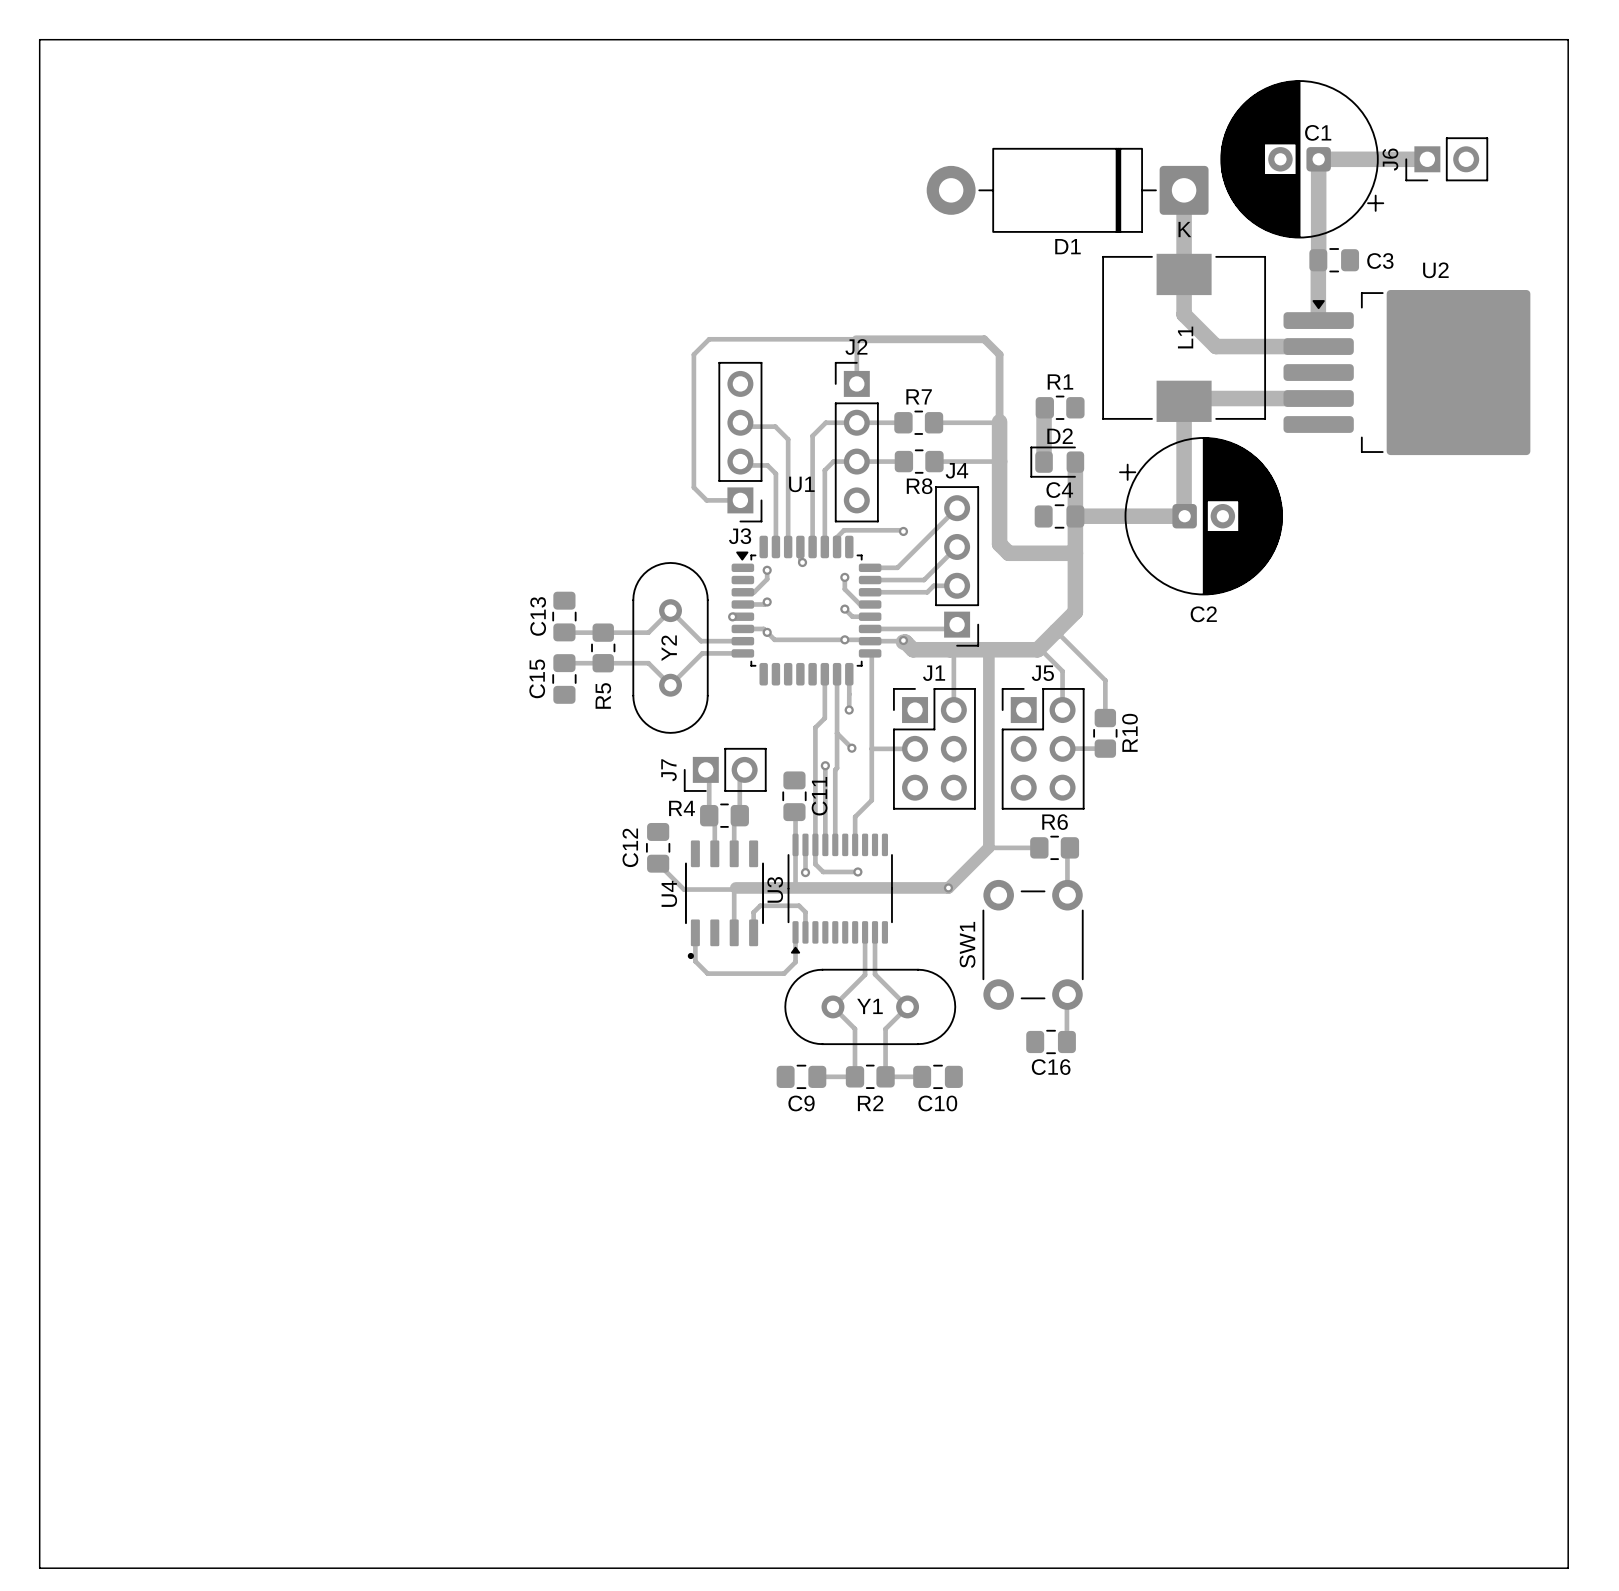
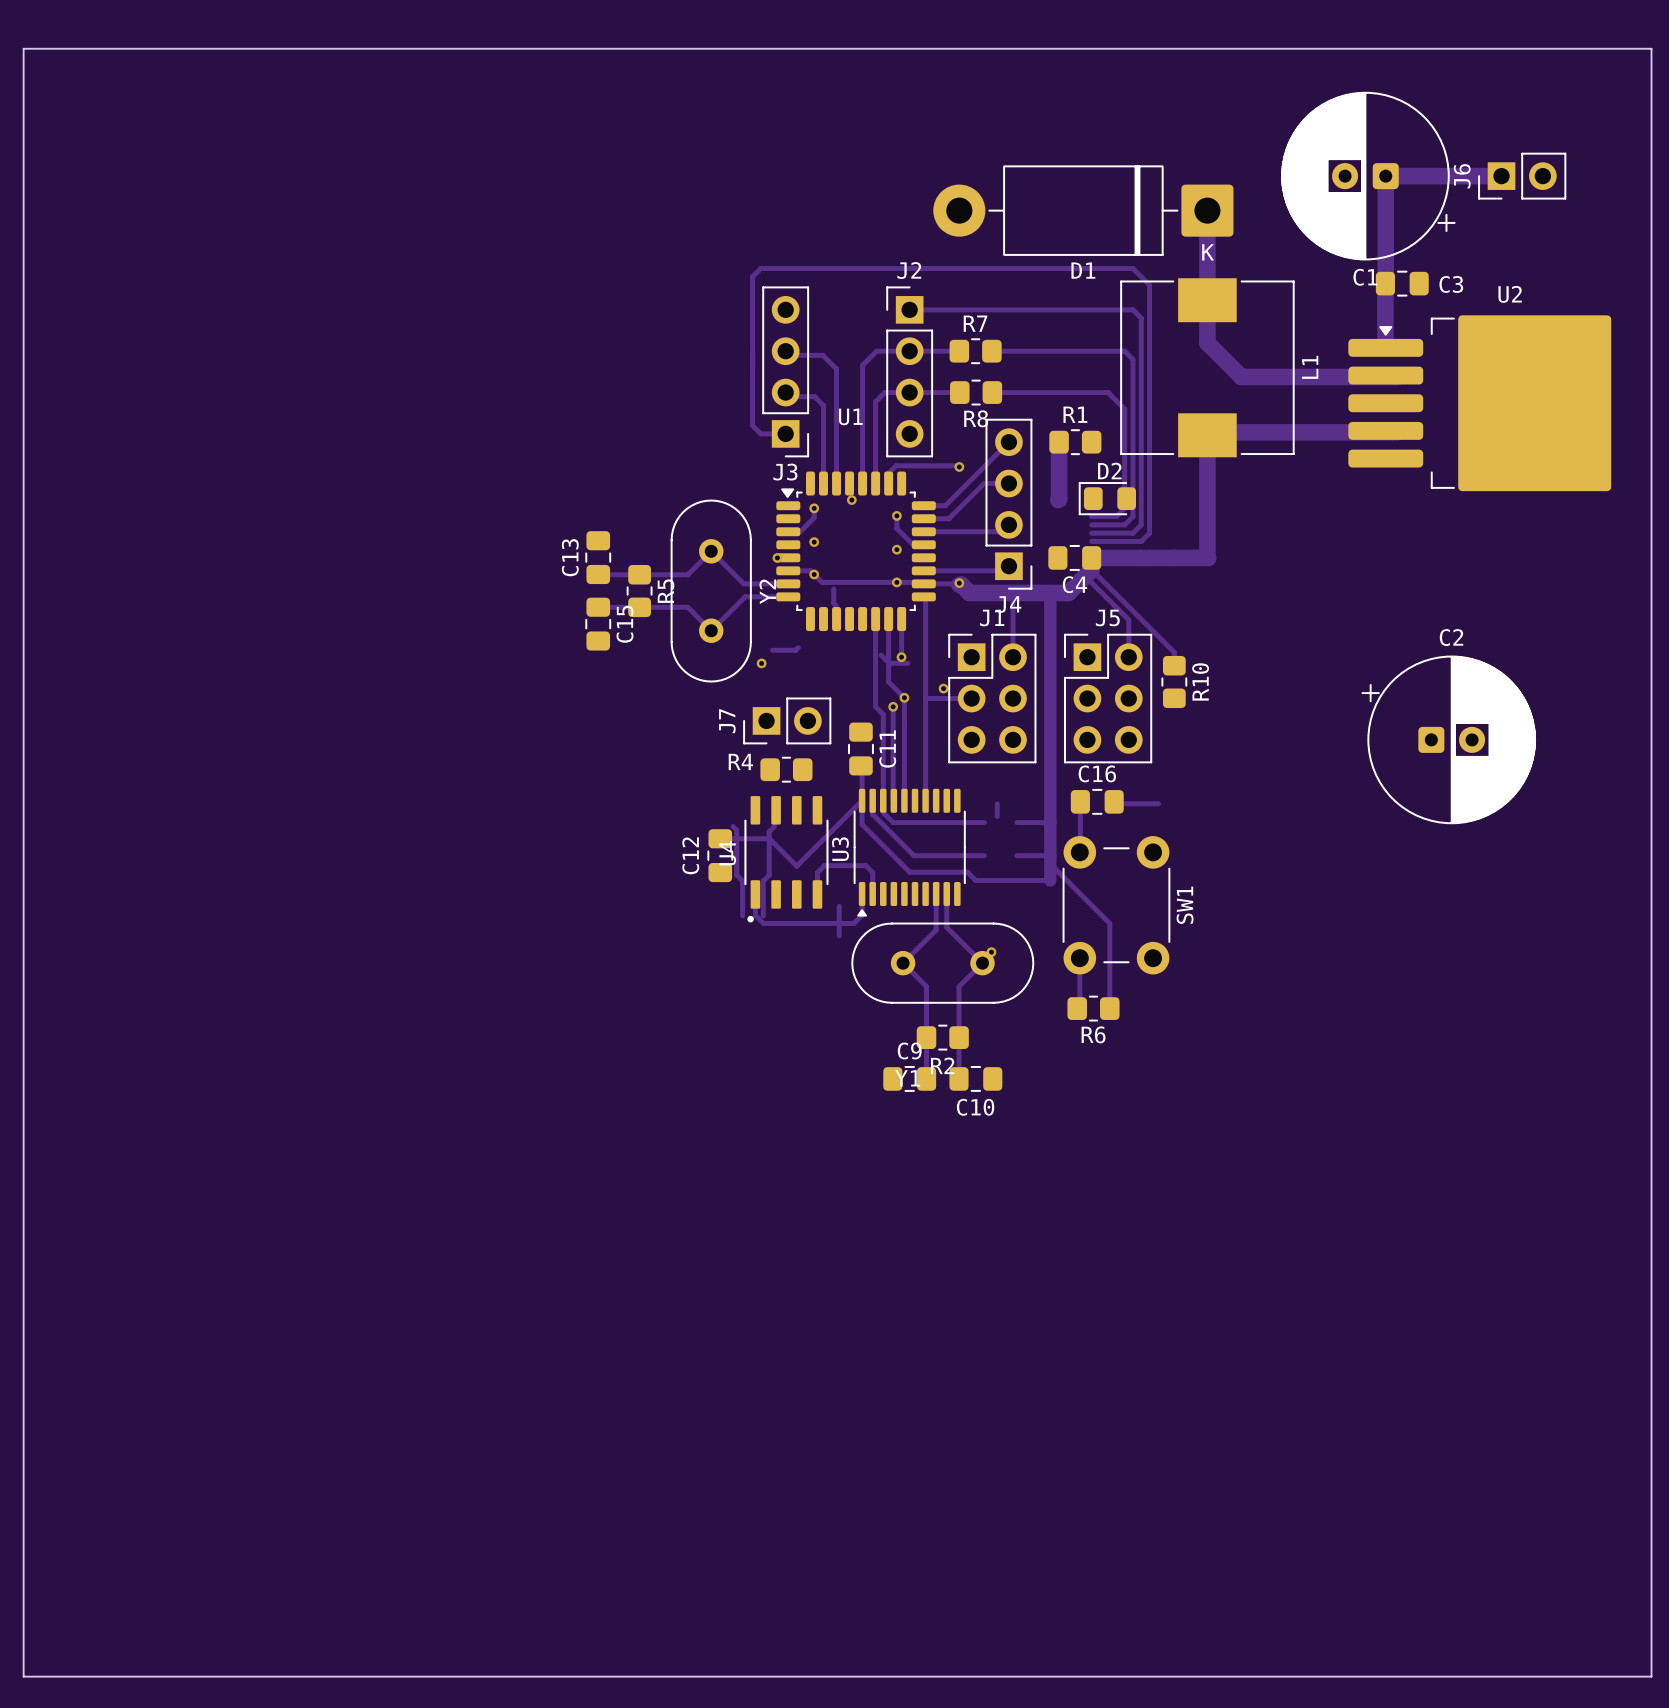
C1 name position: C1 (1318, 132) -> C1 (1365, 277)
D1 position: (1067, 190) -> (1083, 210)
track: (1184, 190) (1184, 314) (1216, 346) (1318, 346) -> none
track: none -> (1207, 210) (1207, 342) (1241, 376) (1397, 376)
track: none -> (909, 309) (1133, 309) (1141, 318) (1141, 524) (1133, 533) (1091, 533)
track: none -> (991, 351) (1124, 351) (1133, 359) (1133, 516) (1124, 524) (1091, 524)
L1 position: (1184, 337) -> (1207, 367)
L1 name position: L1 (1185, 337) -> L1 (1310, 367)
track: (855, 339) (709, 339) (693, 354) (693, 487) (706, 500) (740, 500) (736, 504) -> none
track: (855, 339) (856, 383) -> none
track: (855, 339) (984, 339) (999, 354) (999, 421) -> none
track: none -> (992, 392) (1108, 392) (1124, 409) (1124, 508) (1116, 516) (1091, 516)
track: (1318, 398) (1186, 398) (1184, 401) (1184, 516) (1075, 516) -> none
track: none -> (1397, 432) (1210, 432) (1207, 435) (1208, 557) (1091, 557)
track: none -> (781, 438) (785, 433) (760, 433) (752, 425) (752, 276) (760, 268) (1133, 268) (1149, 285) (1149, 533) (1141, 541) (1091, 541)
track: (1044, 407) (1044, 462) -> none
R1 position: (1060, 407) -> (1075, 442)
track: none -> (1008, 442) (945, 505) (923, 505)
track: none -> (1059, 442) (1058, 500)
track: (999, 421) (934, 422) -> none
track: (999, 421) (999, 544) (1008, 553) (1075, 553) -> none
track: (740, 422) (744, 426) (775, 426) (788, 439) (788, 546) -> (785, 351) (789, 355) (822, 355) (836, 368) (836, 483)
track: (903, 422) (825, 422) (812, 435) (812, 546) -> (959, 351) (876, 351) (862, 365) (862, 483)
R7 position: (918, 422) -> (975, 351)
via: none -> (959, 466)
J3 position: (740, 442) -> (785, 371)
J2 position: (856, 442) -> (909, 371)
track: none -> (1008, 483) (984, 483) (948, 518) (923, 518)
track: (740, 461) (744, 465) (767, 465) (775, 473) (775, 546) -> (785, 392) (789, 396) (814, 396) (823, 405) (823, 483)
track: (903, 461) (833, 461) (824, 470) (824, 546) -> (959, 392) (884, 392) (875, 401) (875, 483)
R8 position: (919, 461) -> (976, 392)
track: (934, 461) (999, 461) -> none
track: (1075, 462) (1075, 611) (1037, 649) -> none
via: none -> (851, 500)
J4 name position: J4 (956, 470) -> J4 (1009, 604)
via: none -> (814, 508)
via: none -> (896, 515)
track: none -> (1008, 524) (1002, 531) (923, 531)
C4 name position: C4 (1059, 490) -> C4 (1074, 584)
via: none -> (814, 542)
track: (957, 508) (897, 567) (870, 567) -> none
via: none -> (896, 549)
C4 position: (1059, 516) -> (1074, 557)
C2 position: (1201, 516) -> (1448, 739)
via: none -> (777, 557)
track: none -> (1008, 566) (1004, 570) (923, 570)
track: (903, 531) (844, 530) (837, 537) (837, 546) -> (959, 466) (896, 465) (888, 473) (888, 483)
via position: (903, 531) -> (959, 583)
via: none -> (814, 574)
track: none -> (1085, 576) (1128, 619) (1128, 657)
via: none -> (896, 582)
track: none -> (959, 584) (969, 592) (1068, 592) (1091, 569) (1174, 652) (1174, 665)
track: (957, 546) (924, 580) (870, 580) -> none
track: none -> (1050, 592) (1050, 880) (975, 880) (967, 872) (909, 872) (862, 824) (860, 765)
track: none -> (923, 596) (925, 598) (925, 800)
via: (802, 562) -> none
J4 position: (957, 566) -> (1008, 504)
track: (767, 570) (767, 579) (754, 592) (742, 592) -> (814, 508) (814, 517) (800, 531) (788, 531)
via: (767, 570) -> none
track: none -> (875, 619) (875, 706) (883, 714) (883, 812) (893, 822) (984, 822)
track: none -> (888, 619) (888, 682) (904, 697) (904, 800)
track: (844, 577) (844, 589) (860, 604) (870, 604) -> (896, 515) (896, 528) (913, 544) (923, 544)
via: (844, 577) -> none
track: (957, 585) (933, 585) (927, 592) (870, 592) -> none
via: (767, 601) -> none
via: (844, 609) -> none
U1 position: (806, 610) -> (856, 551)
via: none -> (901, 657)
C2 name position: C2 (1203, 614) -> C2 (1451, 637)
C13 position: (564, 616) -> (598, 557)
track: (957, 624) (950, 624) (945, 628) (870, 628) -> none
track: (742, 628) (763, 628) (774, 639) (903, 640) -> (788, 570) (810, 570) (822, 582) (959, 583)
track: (1056, 631) (1105, 680) (1105, 718) -> none
track: (564, 632) (648, 632) (670, 610) (701, 641) (742, 641) -> (598, 574) (687, 574) (711, 551) (743, 583) (788, 583)
via: (767, 632) -> none
via: (844, 639) -> none
track: (903, 642) (913, 649) (1037, 649) -> none
R5 position: (603, 647) -> (639, 591)
Y2 position: (670, 647) -> (711, 591)
Y2 name position: Y2 (669, 648) -> Y2 (767, 591)
via: none -> (904, 697)
track: (950, 649) (953, 653) (953, 710) -> (1008, 592) (1013, 597) (1013, 657)
track: (988, 649) (988, 847) -> none
track: (1037, 649) (1041, 649) (1062, 671) (1062, 710) -> none
track: (742, 653) (702, 653) (670, 685) (648, 663) (564, 663) -> (788, 596) (745, 596) (711, 630) (687, 607) (598, 607)
track: (870, 653) (871, 655) (871, 800) (855, 816) (855, 844) -> none
track: none -> (893, 706) (893, 800)
via: none -> (893, 706)
track: (824, 674) (824, 718) (815, 727) (815, 864) (823, 871) (857, 871) -> none
track: (837, 674) (835, 844) -> none
track: (849, 674) (849, 710) -> (901, 619) (901, 657)
C15 name position: C15 (537, 678) -> C15 (624, 624)
C15 position: (564, 678) -> (598, 624)
R5 name position: R5 (603, 695) -> R5 (666, 591)
via: (849, 710) -> none
track: (837, 733) (851, 748) -> none
R10 position: (1105, 733) -> (1174, 682)
track: none -> (862, 800) (796, 866) (769, 838) (720, 838)
track: none -> (872, 800) (872, 814) (914, 855) (984, 855)
track: none -> (1080, 801) (1079, 852)
via: (851, 748) -> none
track: (871, 748) (915, 748) -> (925, 698) (971, 698)
J1 position: (934, 748) -> (992, 698)
J5 position: (1043, 748) -> (1108, 698)
track: (825, 765) (825, 844) -> none
via: (825, 765) -> none
track: none -> (1016, 822) (1050, 822)
J7 position: (725, 769) -> (787, 720)
C11 position: (794, 796) -> (860, 749)
track: none -> (1016, 855) (1050, 855)
track: none -> (1050, 863) (1109, 923) (1109, 1008)
track: (794, 812) (795, 888) -> none
R4 position: (724, 815) -> (786, 769)
R6 name position: R6 (1055, 822) -> R6 (1093, 1034)
track: none -> (862, 893) (862, 915) (853, 923) (763, 923) (755, 915) (755, 894)
track: none -> (936, 893) (936, 930) (903, 963) (926, 986) (926, 1078)
track: none -> (946, 893) (946, 927) (982, 963) (959, 986) (959, 1078)
C12 position: (658, 847) -> (720, 855)
track: (988, 847) (1039, 847) -> none
track: (988, 847) (948, 887) (735, 887) -> none
R6 position: (1054, 847) -> (1093, 1008)
track: (1069, 847) (1067, 850) (1067, 895) -> none
track: (658, 863) (684, 889) (734, 889) -> none
via: (857, 871) -> none
via: (805, 872) -> none
track: (734, 889) (734, 932) -> none
U3 position: (840, 893) -> (909, 852)
track: none -> (1079, 958) (1079, 1005) (1077, 1008)
U4 position: (724, 899) -> (786, 859)
track: (795, 932) (795, 962) (784, 973) (707, 973) (695, 961) (695, 932) -> none
track: (805, 932) (805, 912) (799, 905) (760, 905) (753, 912) (753, 932) -> (872, 893) (872, 872) (865, 865) (824, 865) (817, 872) (817, 894)
track: (865, 932) (865, 974) (832, 1006) (854, 1028) (854, 1076) (817, 1076) -> none
track: (875, 932) (875, 974) (907, 1006) (885, 1028) (885, 1076) (922, 1076) -> none
SW1 name position: SW1 (967, 944) -> SW1 (1185, 905)
SW1 position: (1033, 944) -> (1116, 905)
track: (1067, 994) (1066, 1041) -> none
Y1 position: (870, 1006) -> (942, 963)
C16 position: (1051, 1041) -> (1097, 801)
C16 name position: C16 (1051, 1067) -> C16 (1097, 773)
C9 position: (801, 1076) -> (909, 1078)
R2 position: (870, 1076) -> (942, 1037)
C10 position: (938, 1076) -> (975, 1078)
C9 name position: C9 (801, 1103) -> C9 (909, 1050)

